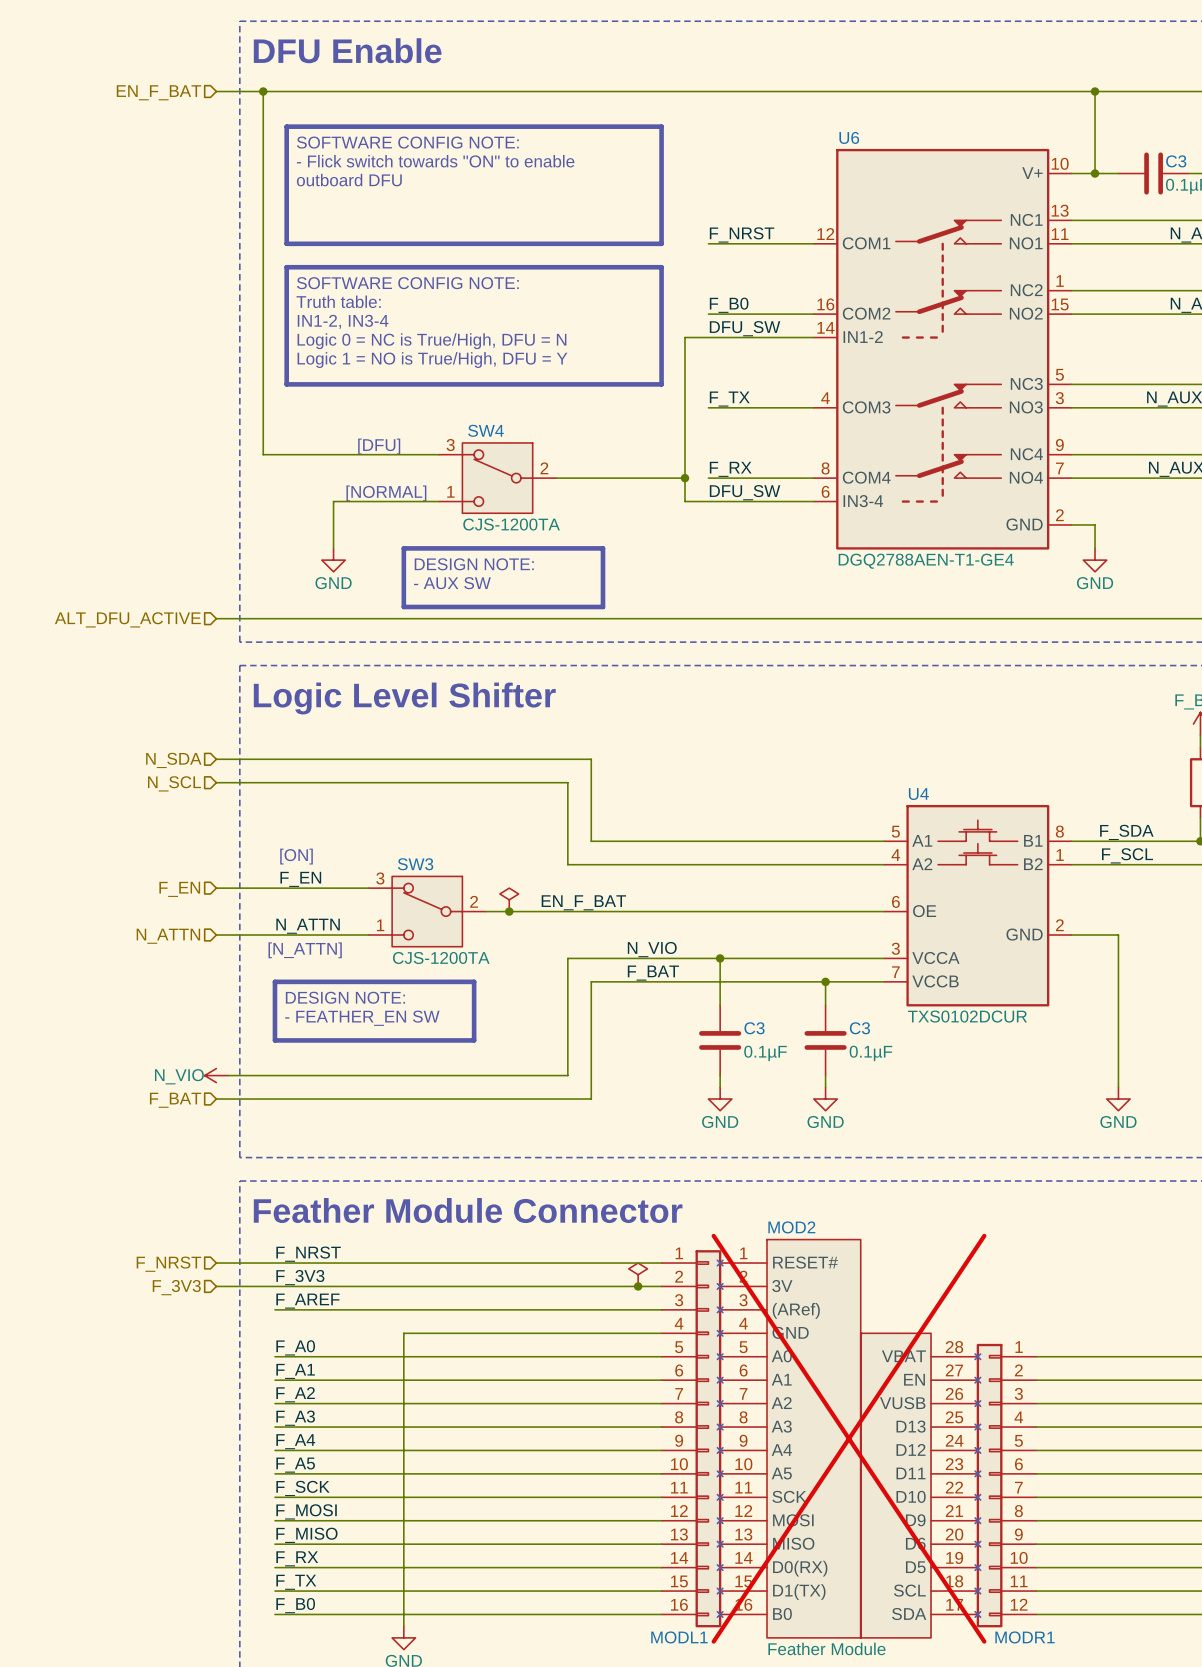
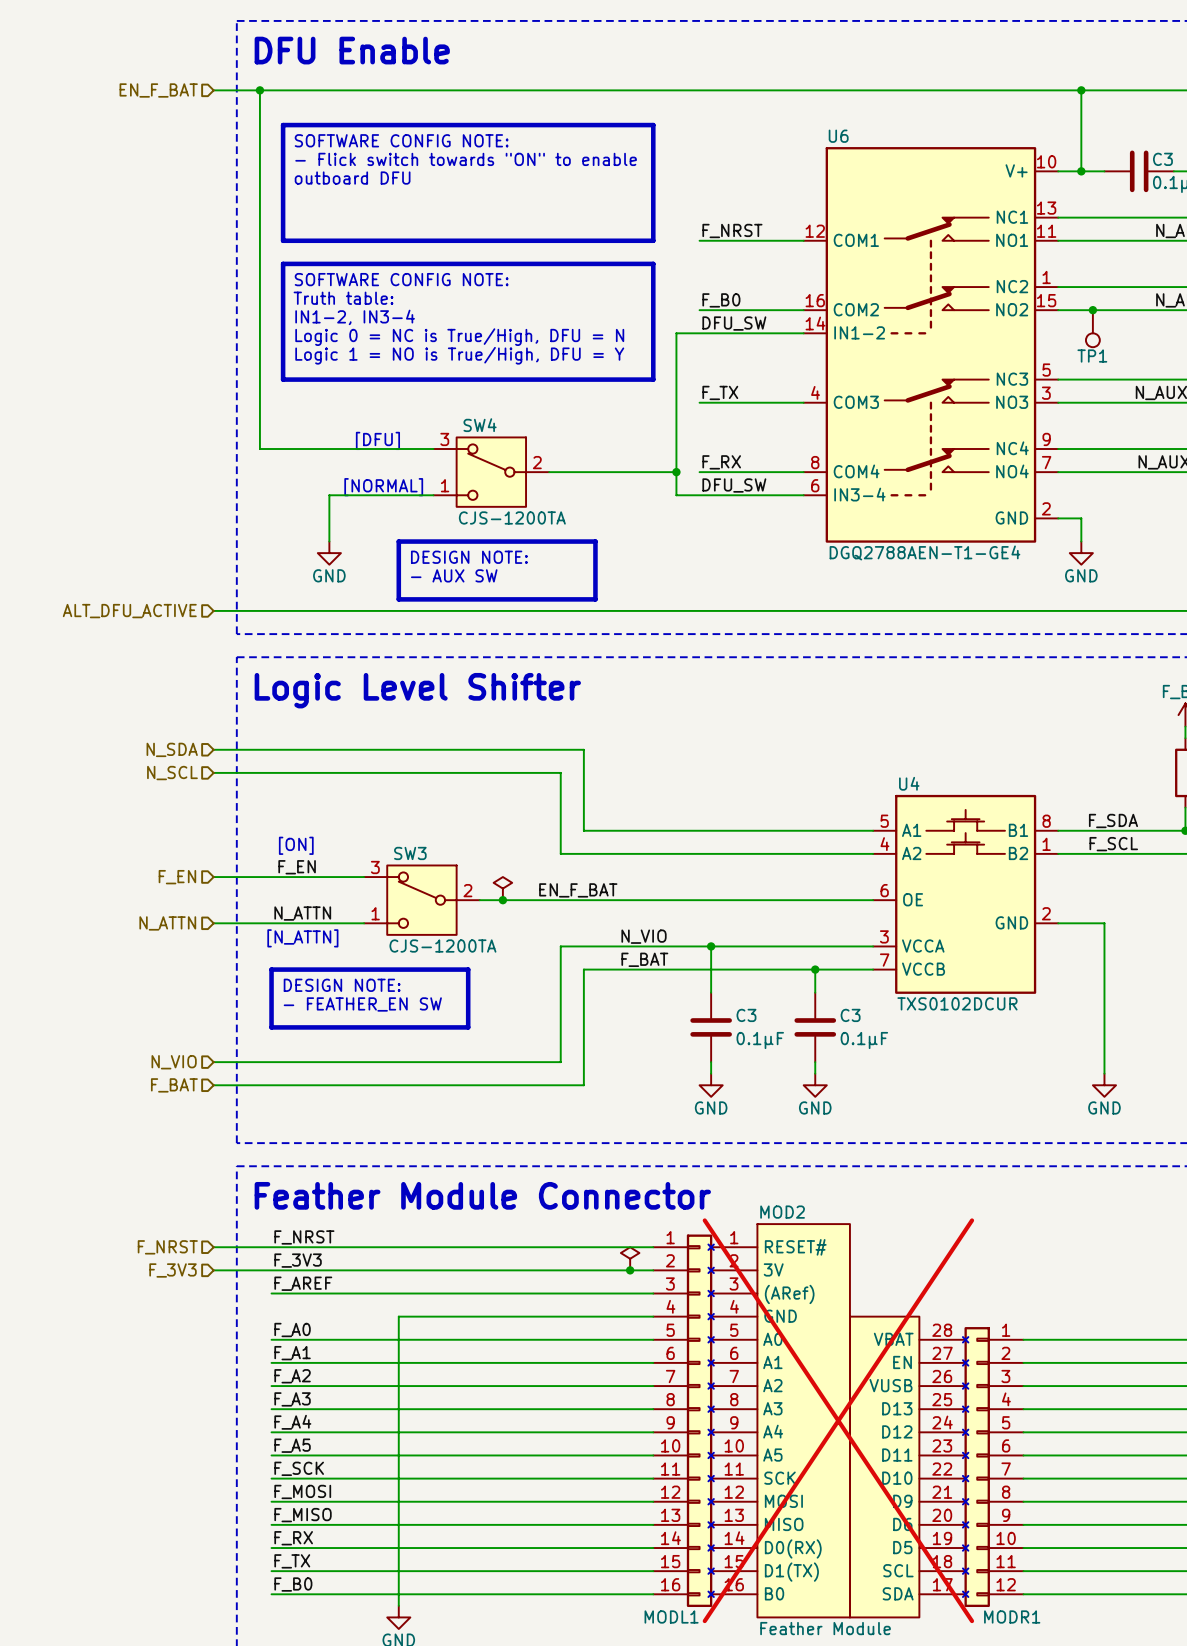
junction: none -> (1092, 310)
TP1: none -> (1092, 328)
power symbol: N_VIO (216, 1075) -> none
hierarchical label: none -> N_VIO (174, 1062)

